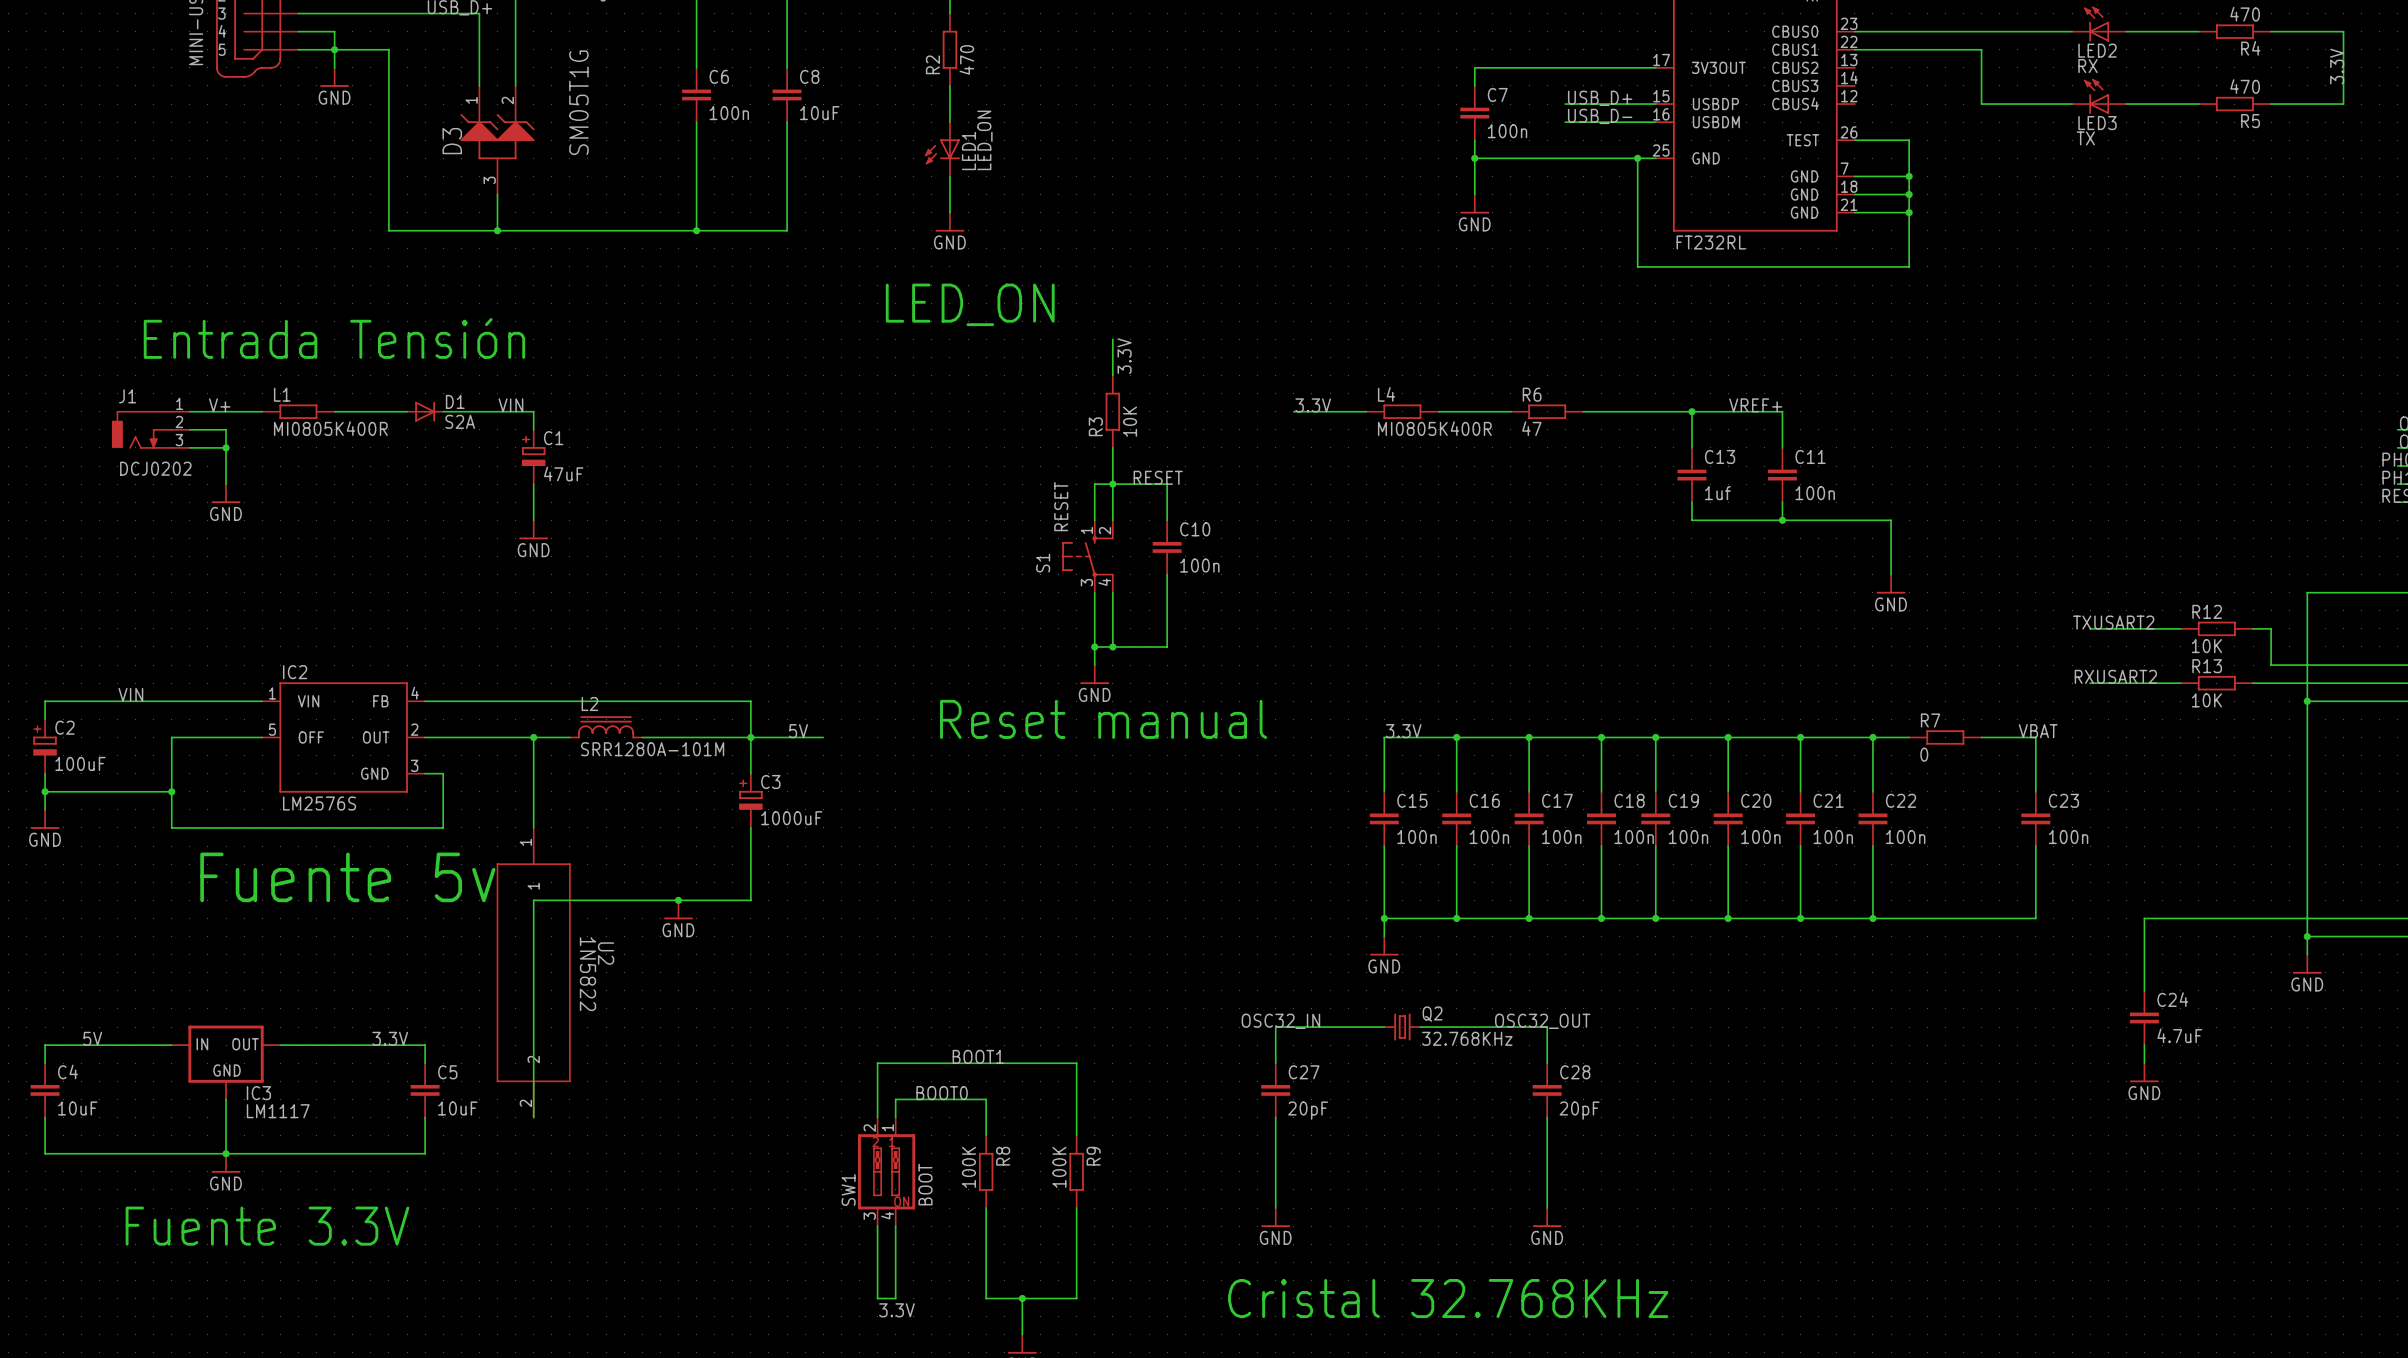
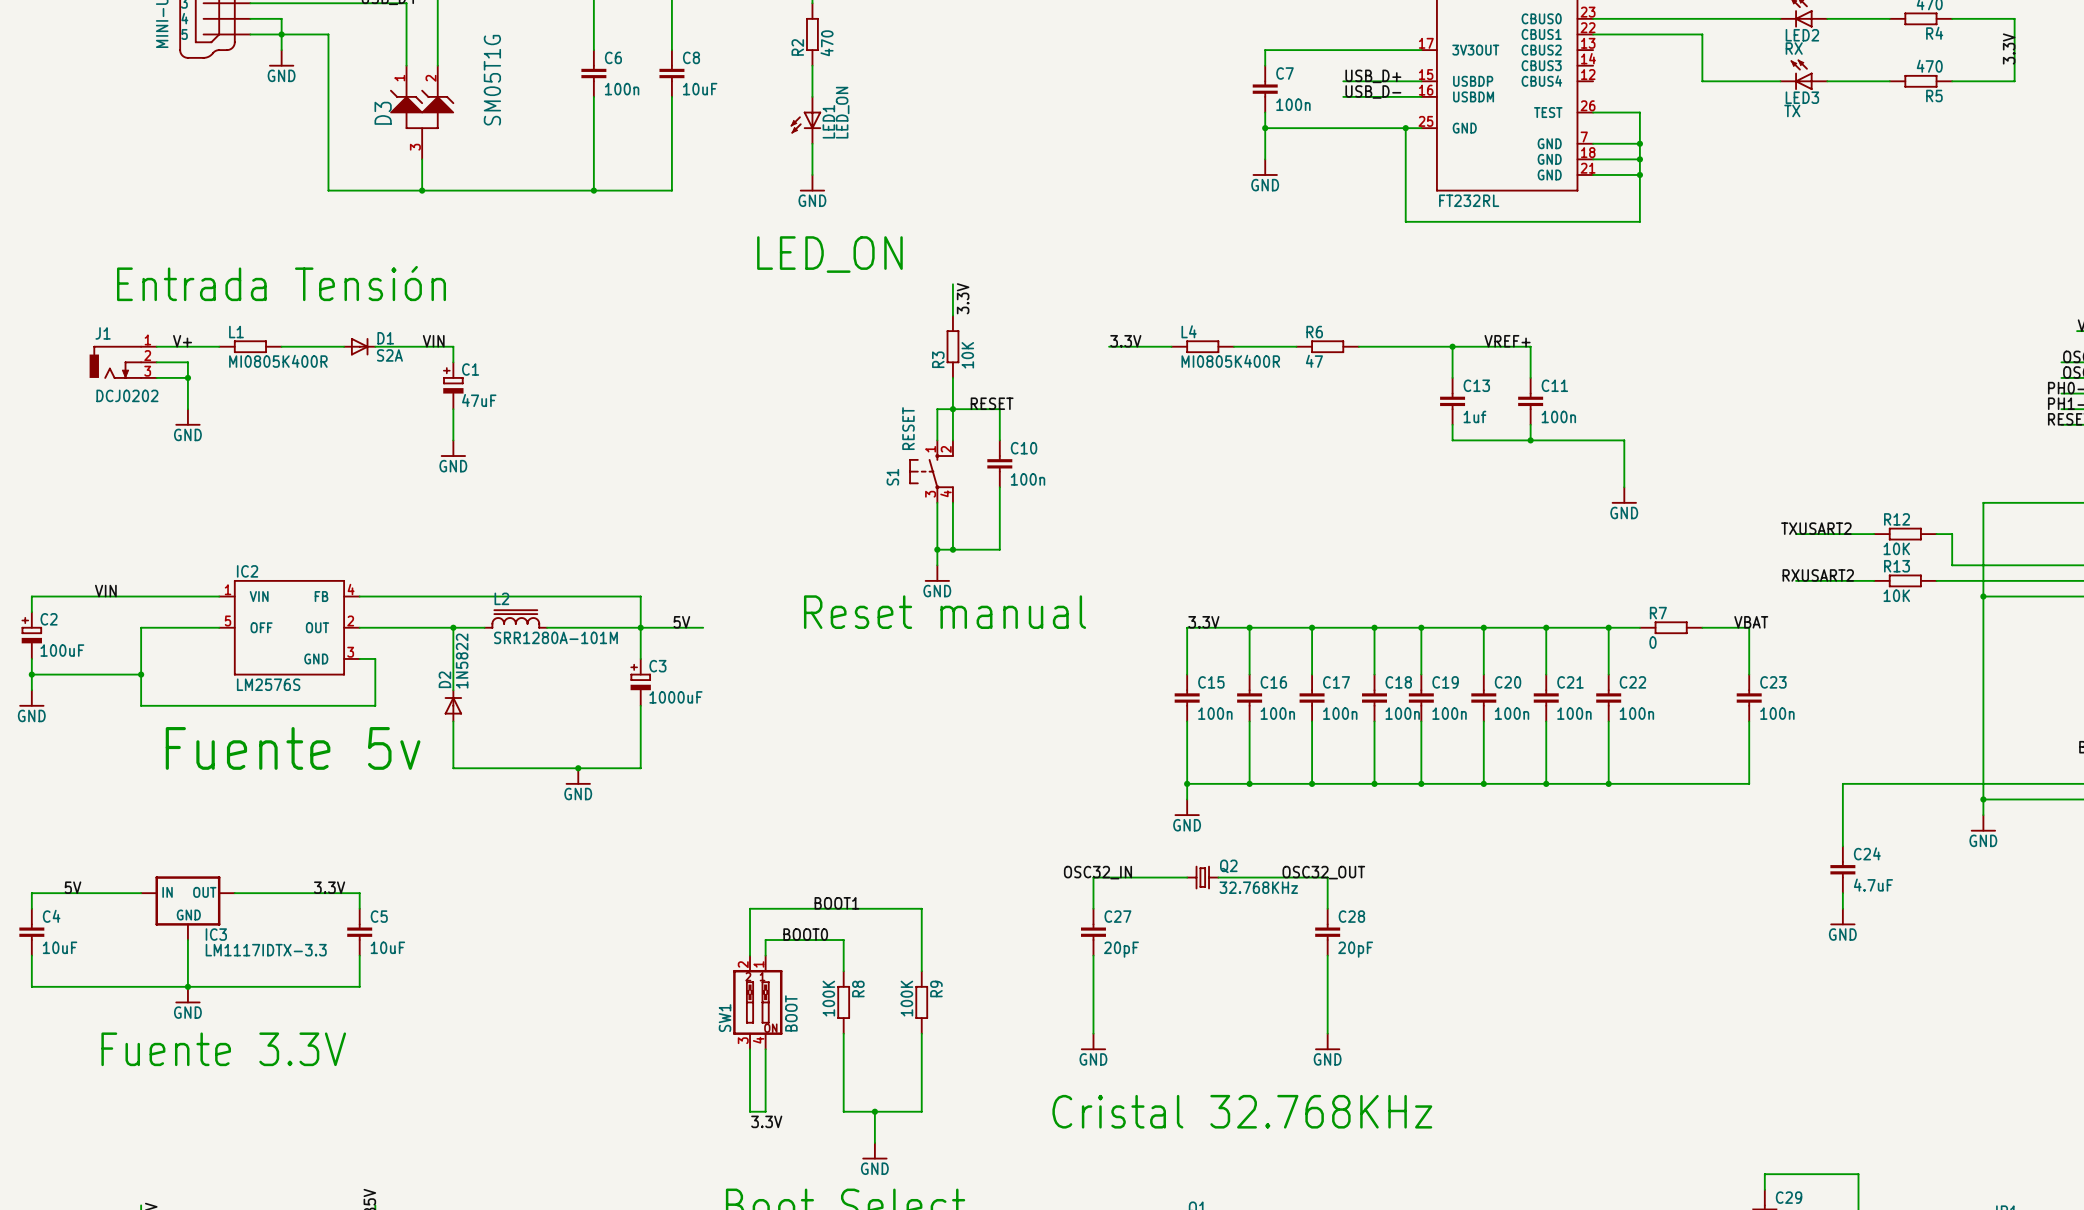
D2: none -> 1N5822 (453, 705)
wire: (533, 900) (533, 1117) -> (453, 768) (453, 721)
U2: 1N5822 (533, 972) -> none
IC3 value: LM1117 (278, 1111) -> LM1117IDTX-3.3 (266, 950)

